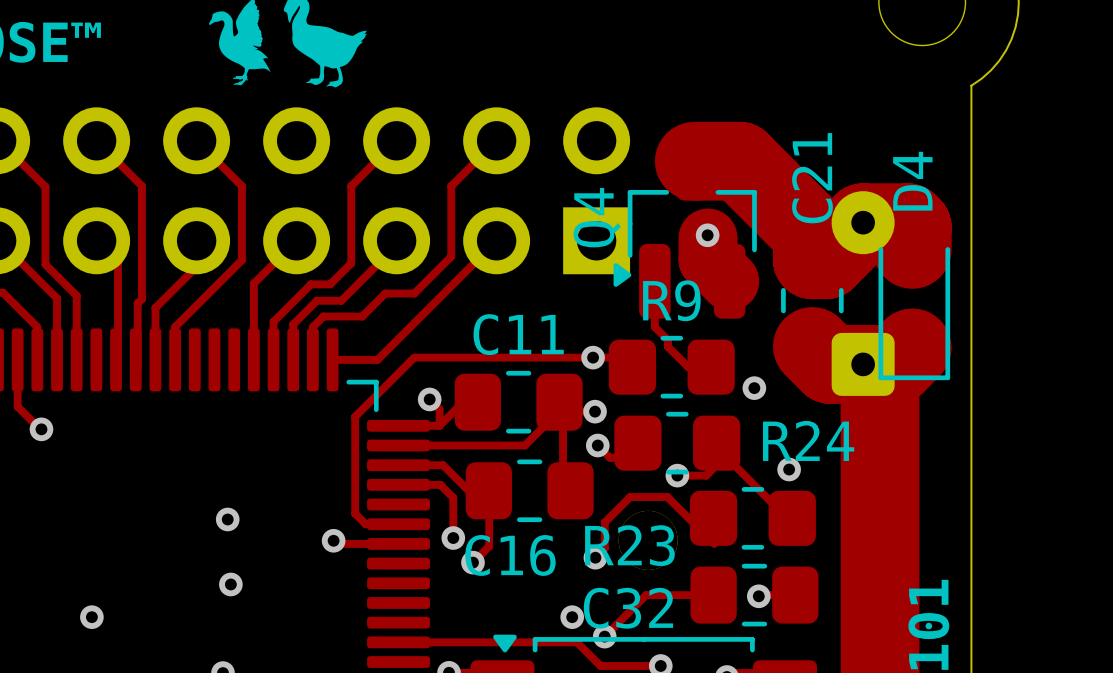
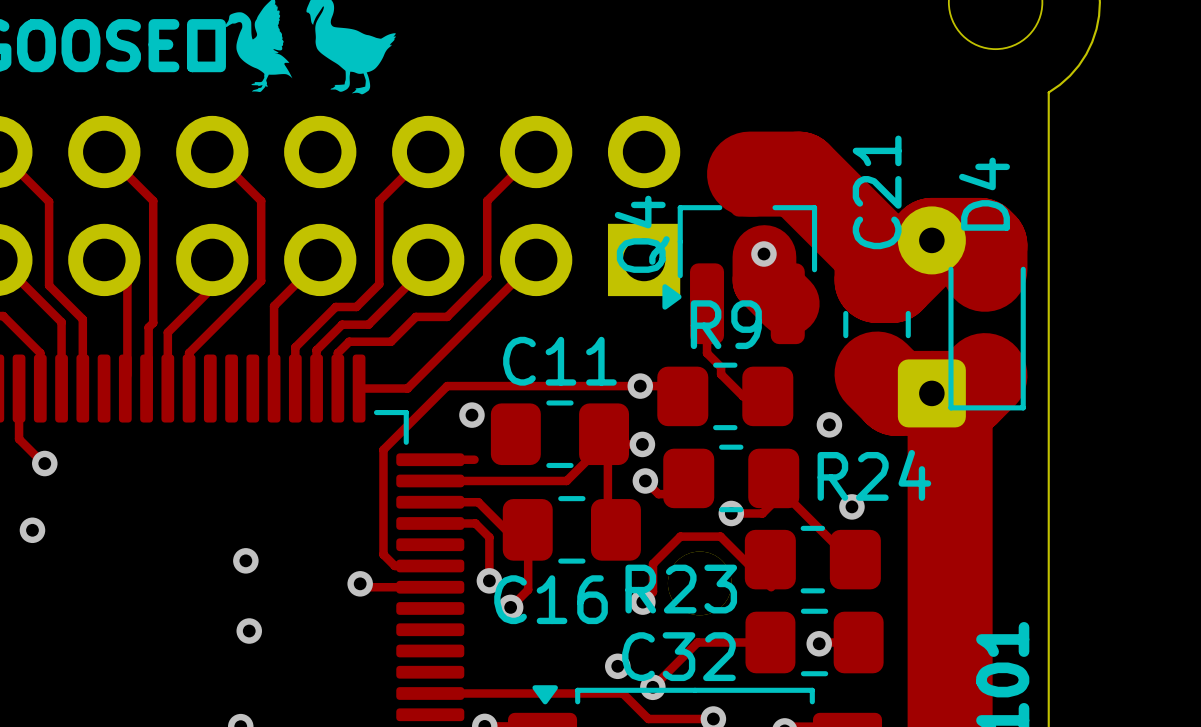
via position: (754, 388) -> (829, 424)
track: (429, 399) (439, 409) (439, 425) (463, 402) -> none
via position: (429, 399) -> (471, 415)
via: none -> (32, 530)
via: (91, 617) -> none

